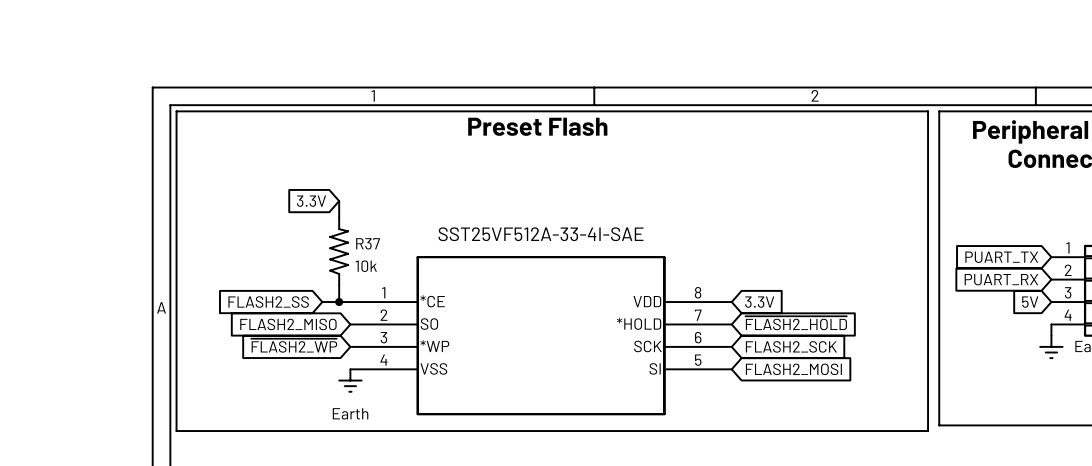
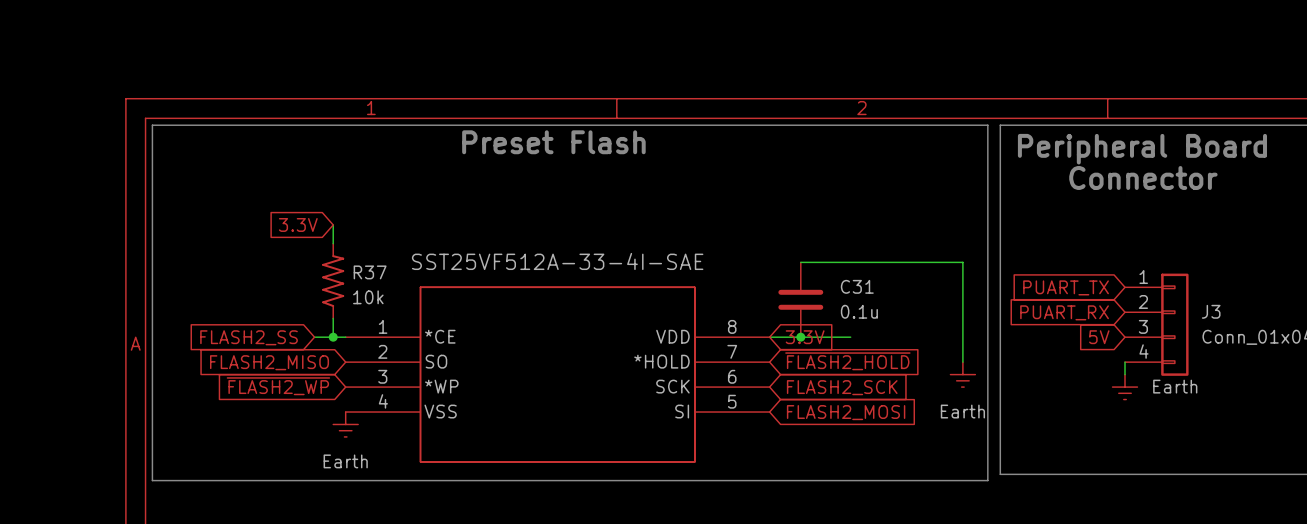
wire: none -> (800, 262) (962, 262) (962, 362)
C31: none -> 0.1u (800, 299)
wire: none -> (769, 337) (850, 337)
junction: none -> (800, 337)
power symbol: none -> Earth (962, 374)

